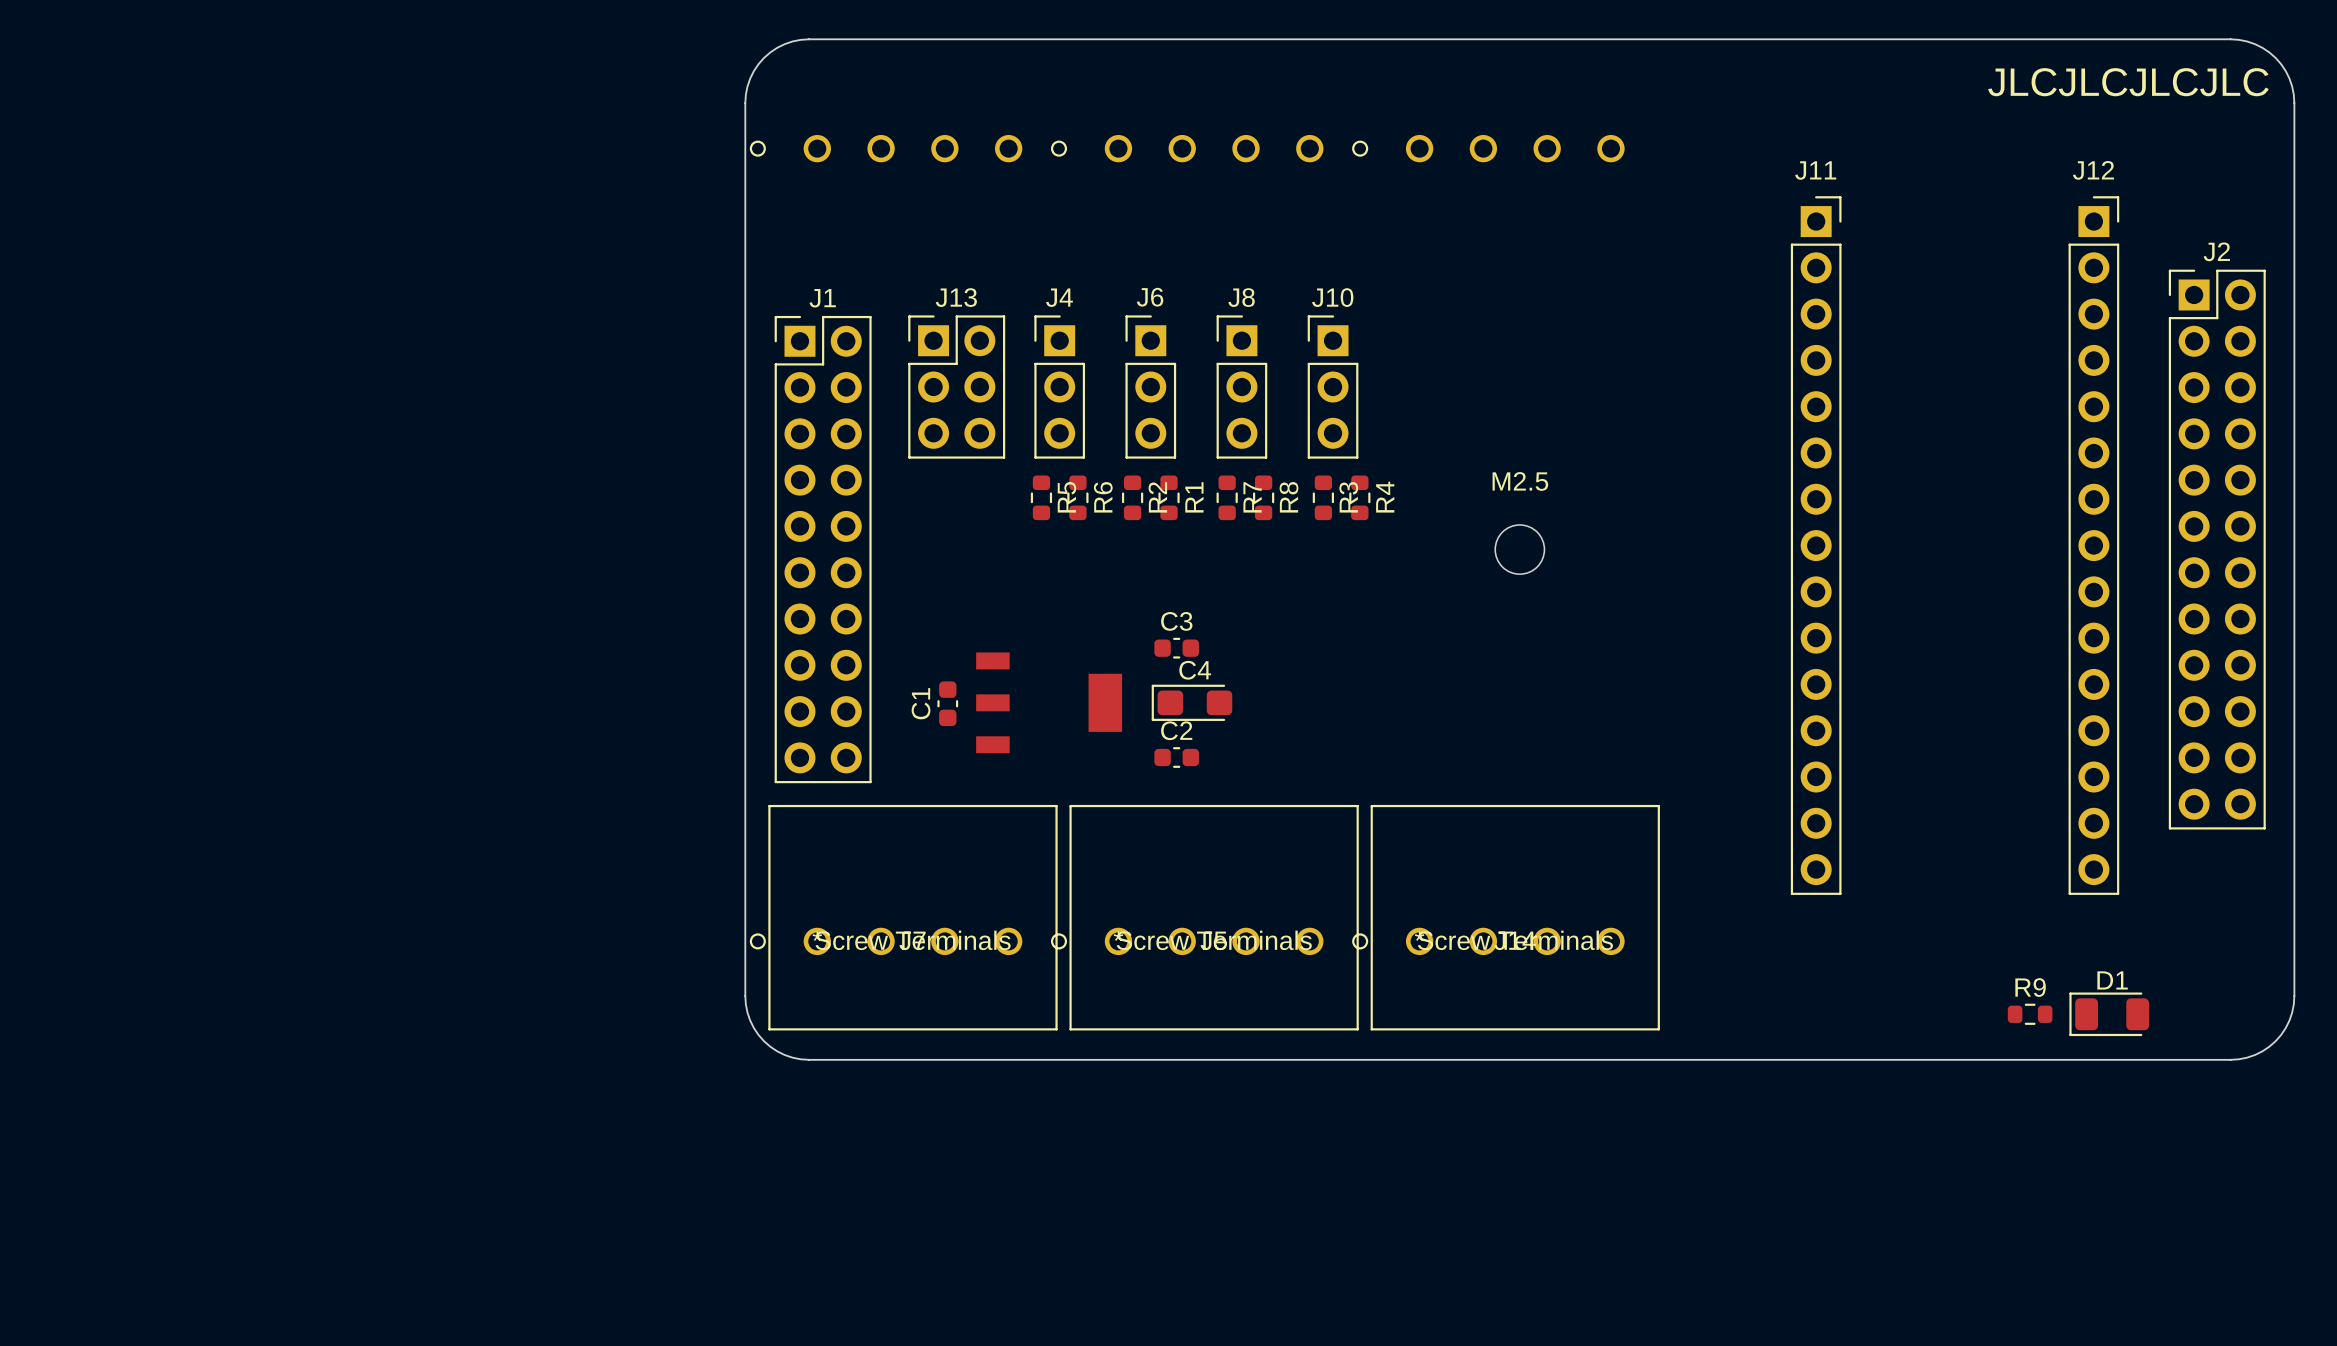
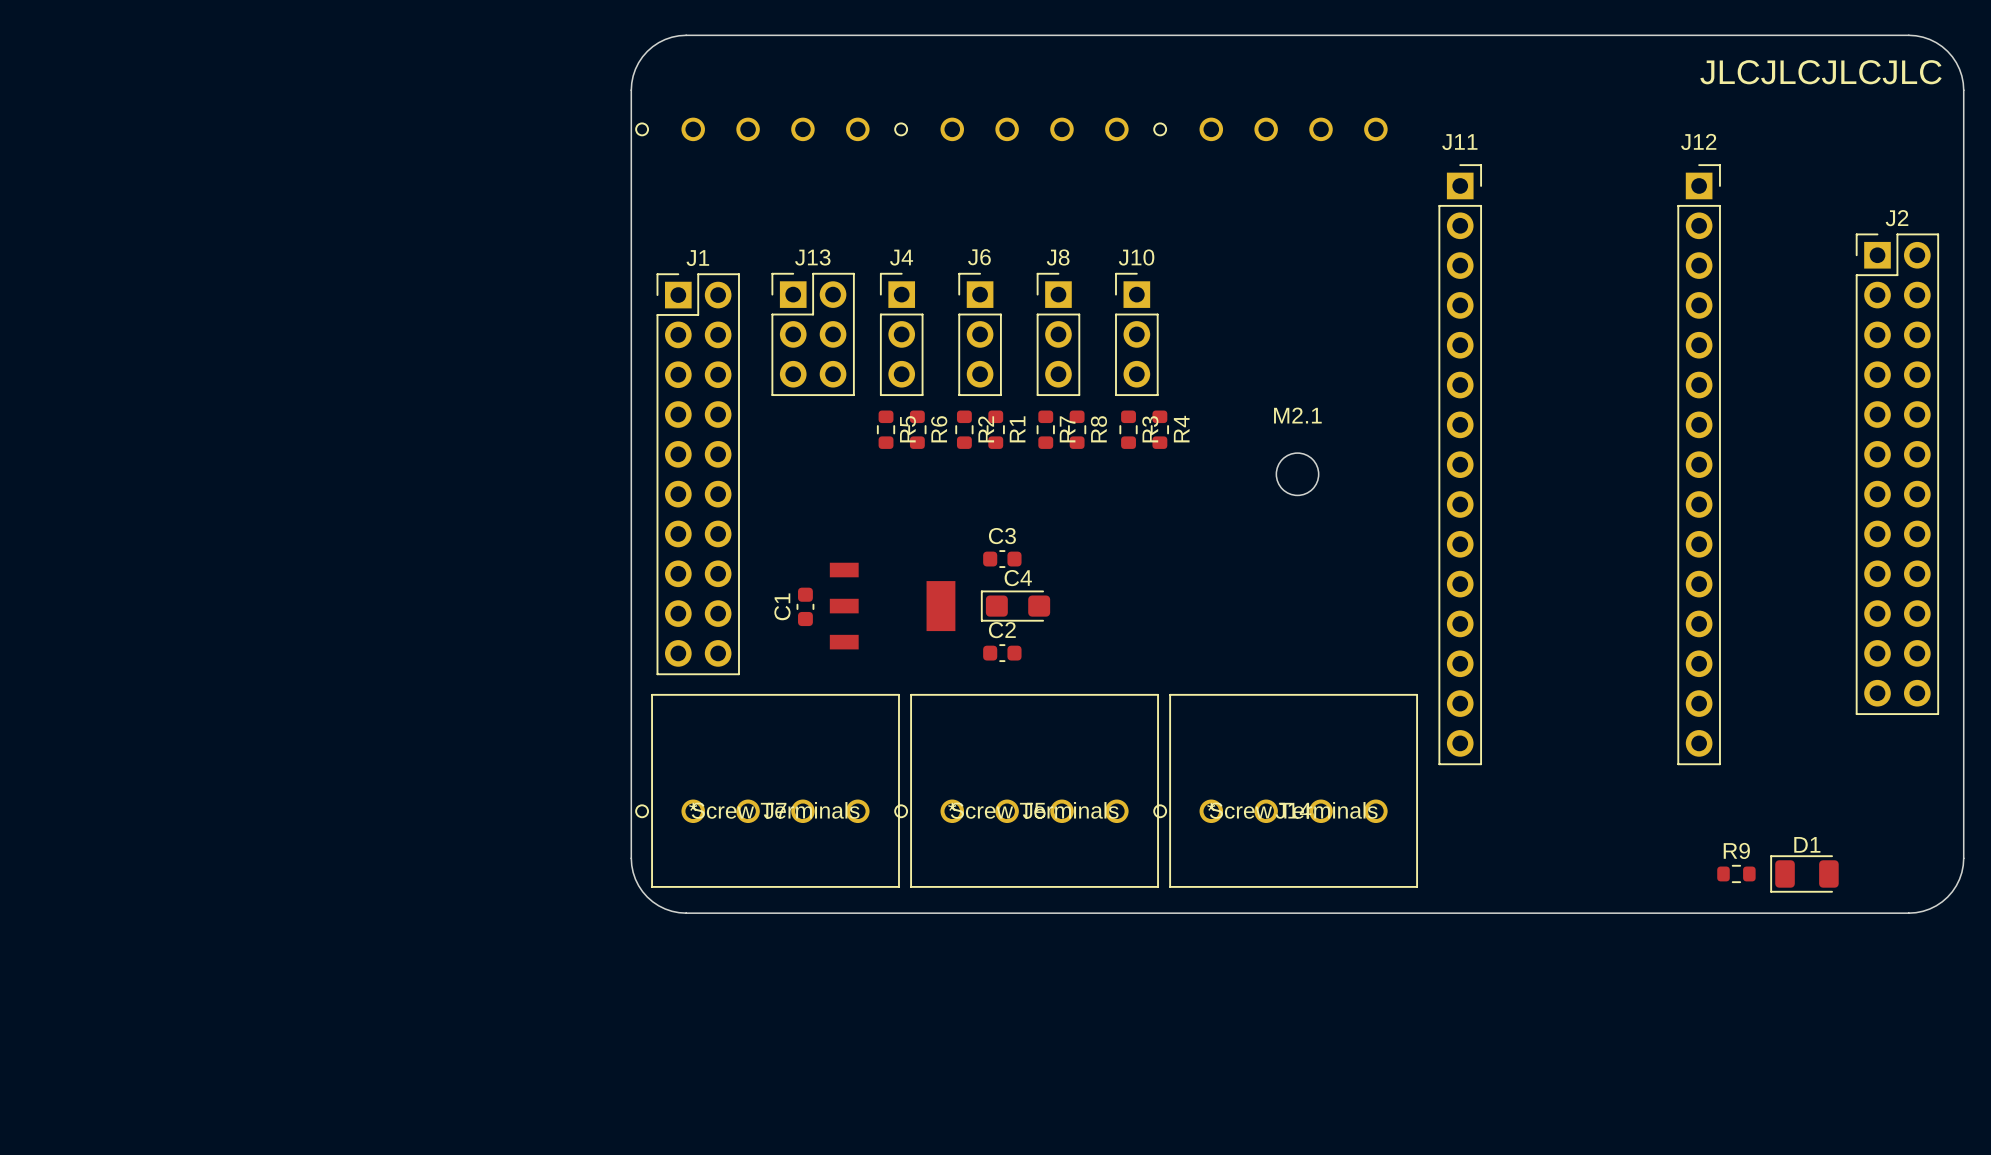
M2.5 name: M2.5 (1520, 481) -> M2.1 (1297, 415)
J11 position: (1816, 545) -> (1460, 464)
J12 position: (2093, 545) -> (1699, 464)

